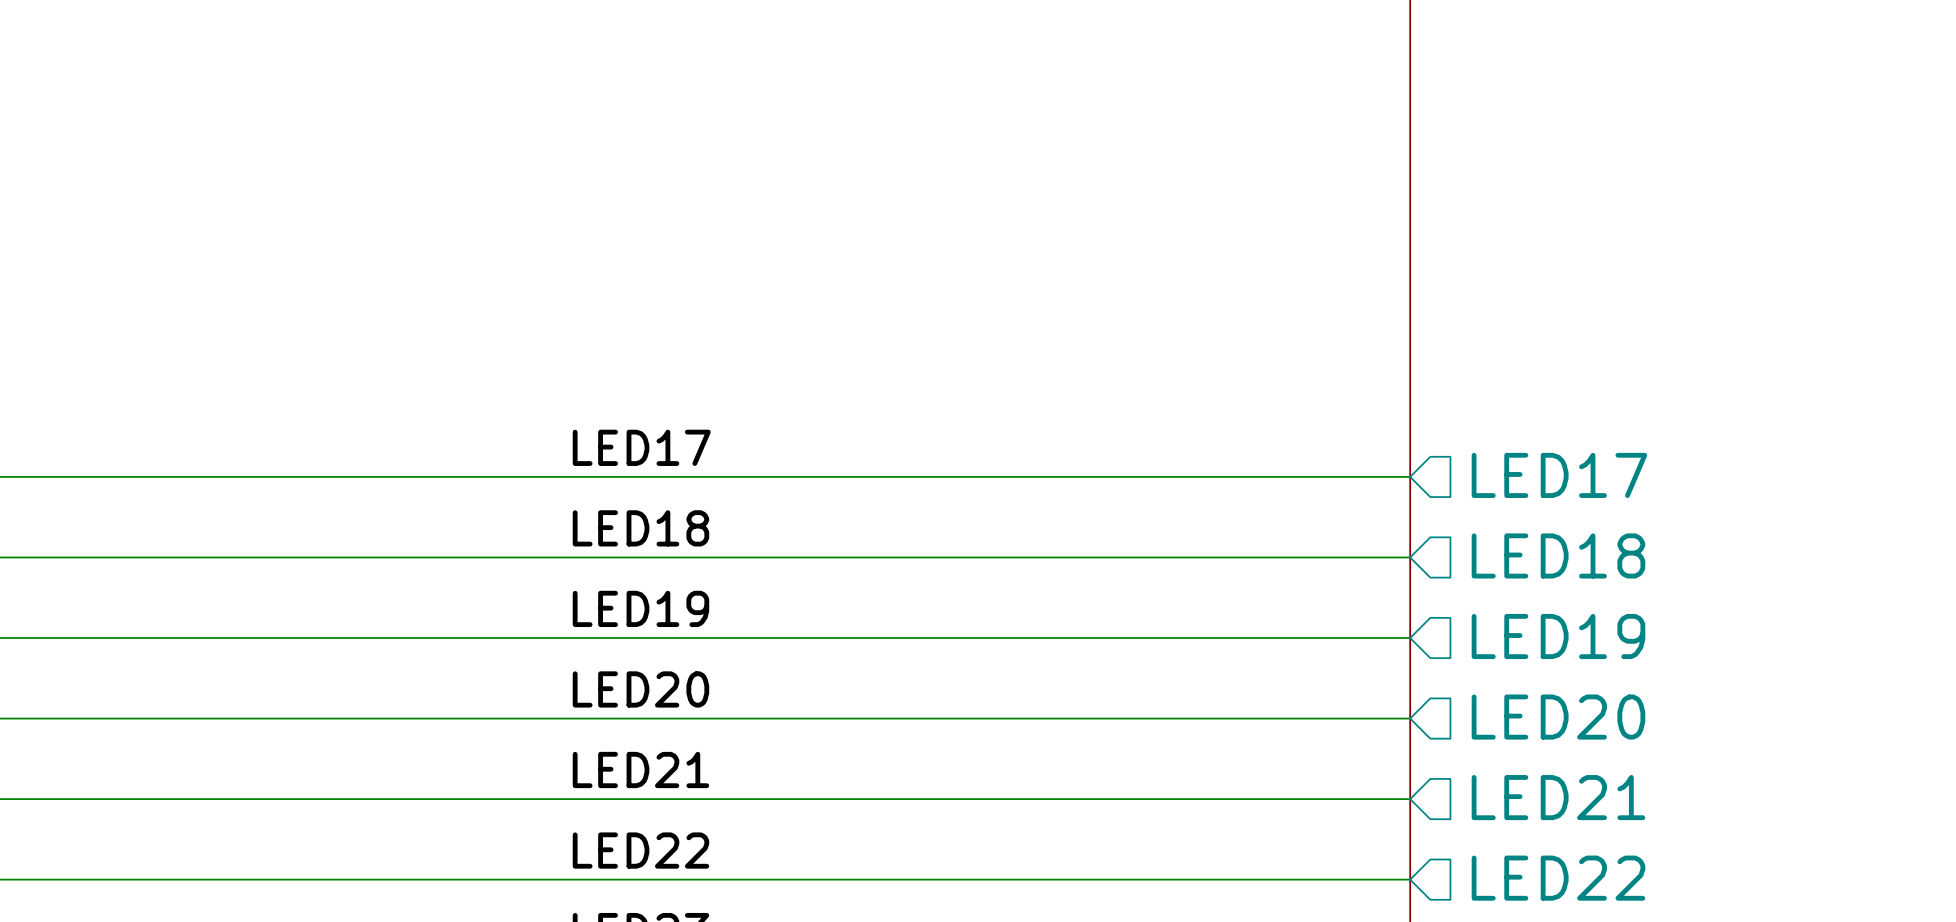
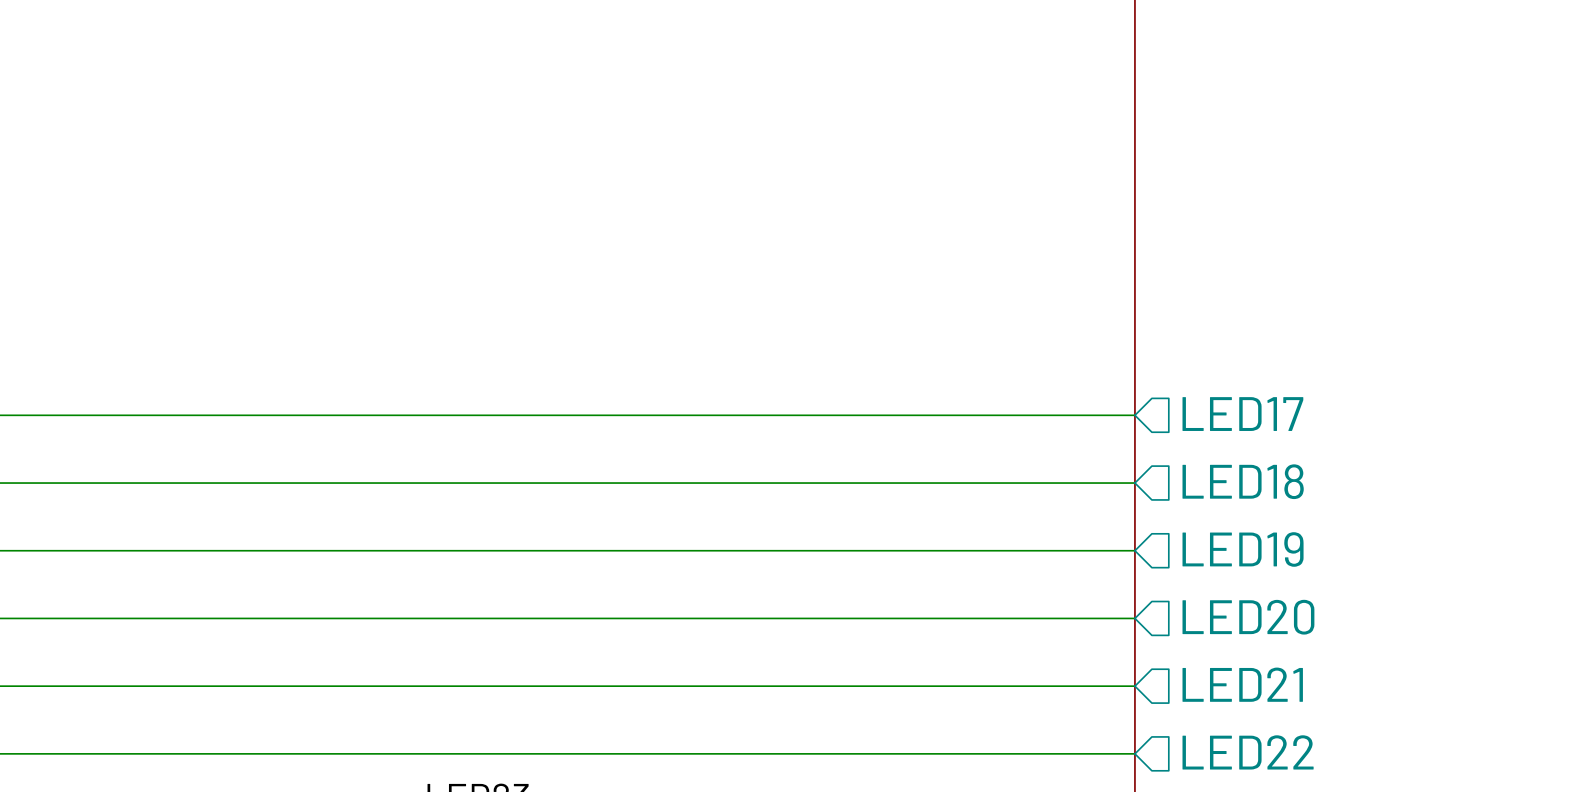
label: LED17 (641, 447) -> none
label: LED18 (640, 528) -> none
label: LED19 (640, 608) -> none
label: LED20 (640, 689) -> none
label: LED21 (640, 769) -> none
label: LED22 (640, 850) -> none

